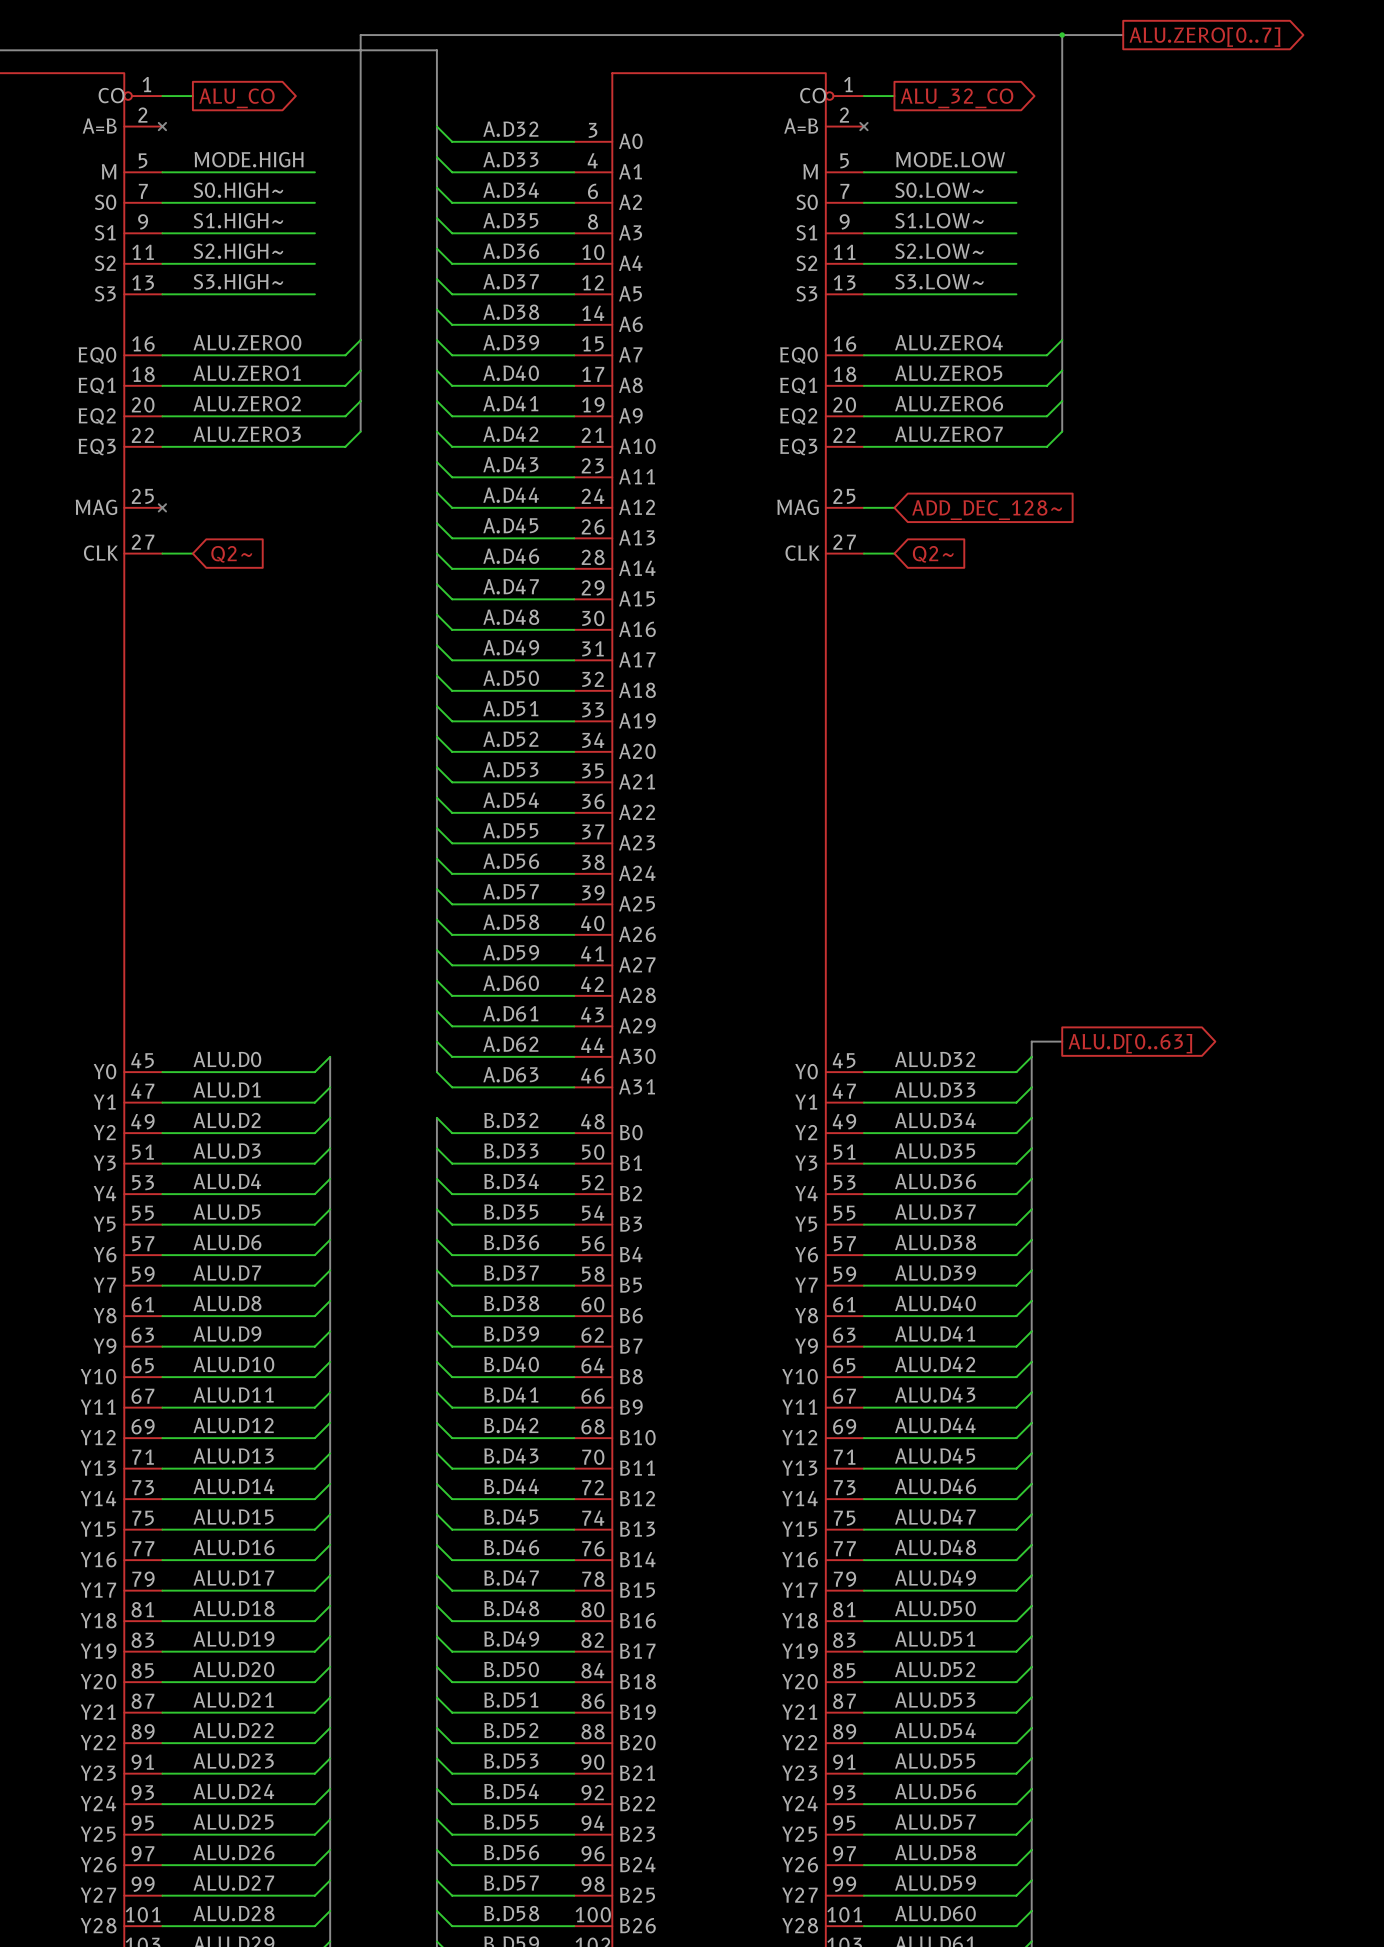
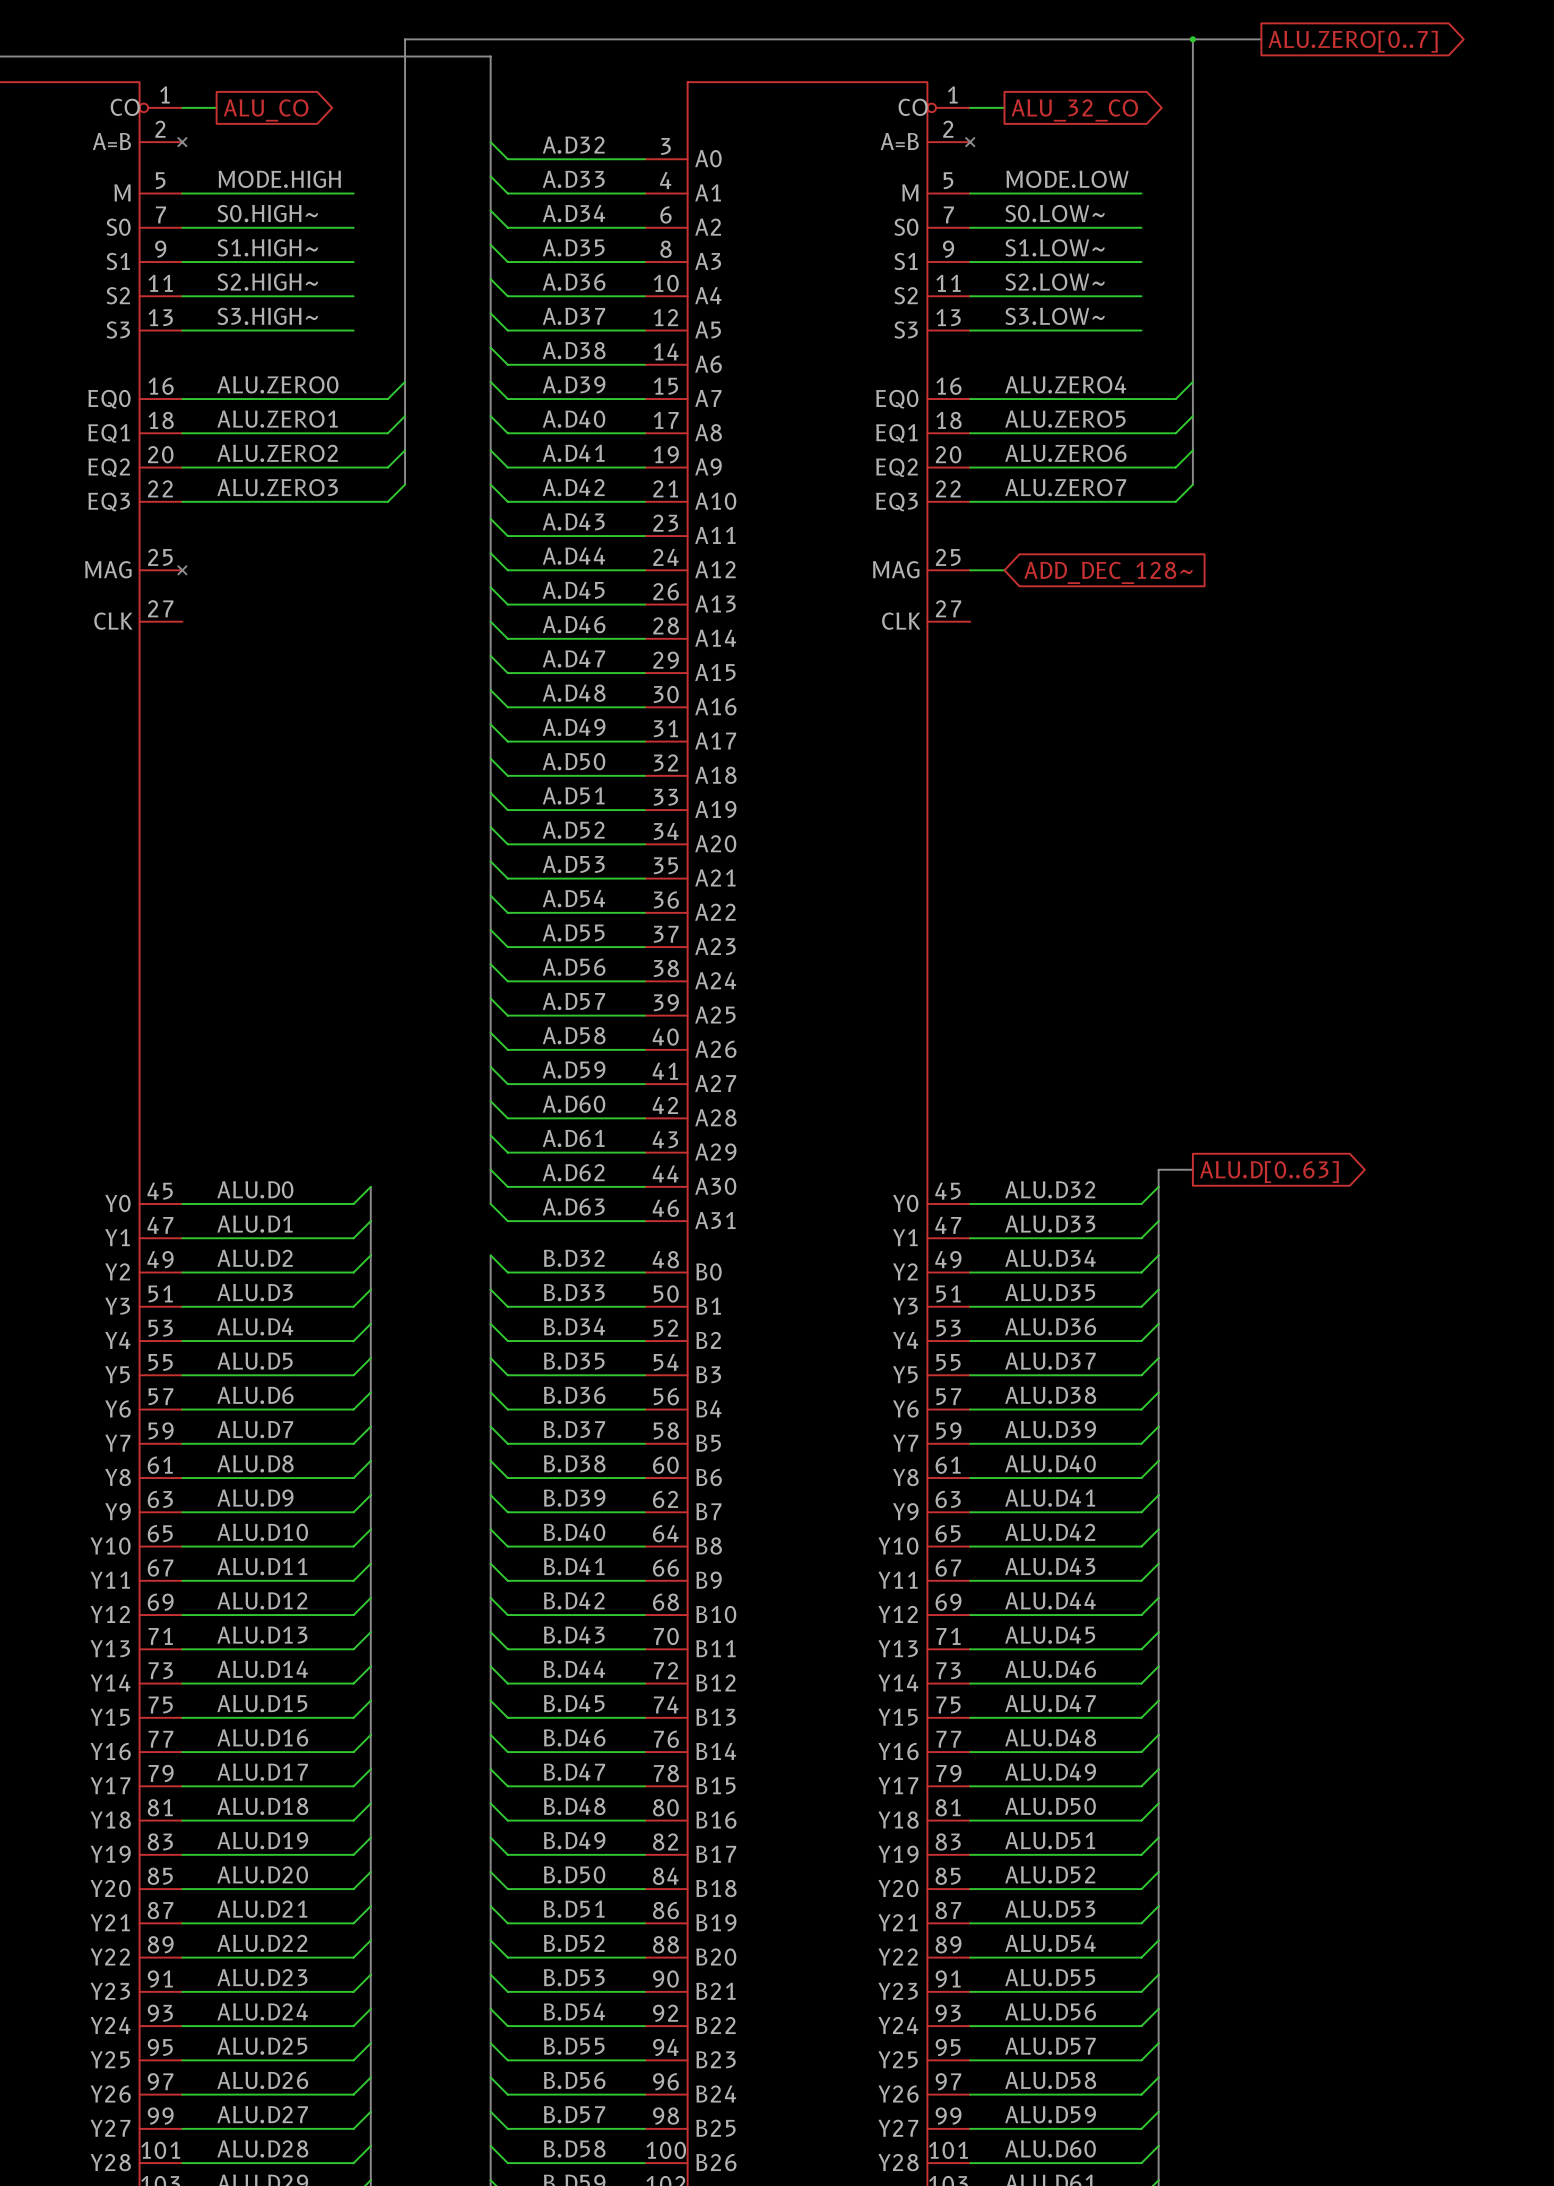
wire: (162, 553) (192, 553) -> none
wire: (863, 553) (894, 553) -> none
global label: Q2~ (231, 554) -> none
global label: Q2~ (933, 554) -> none

